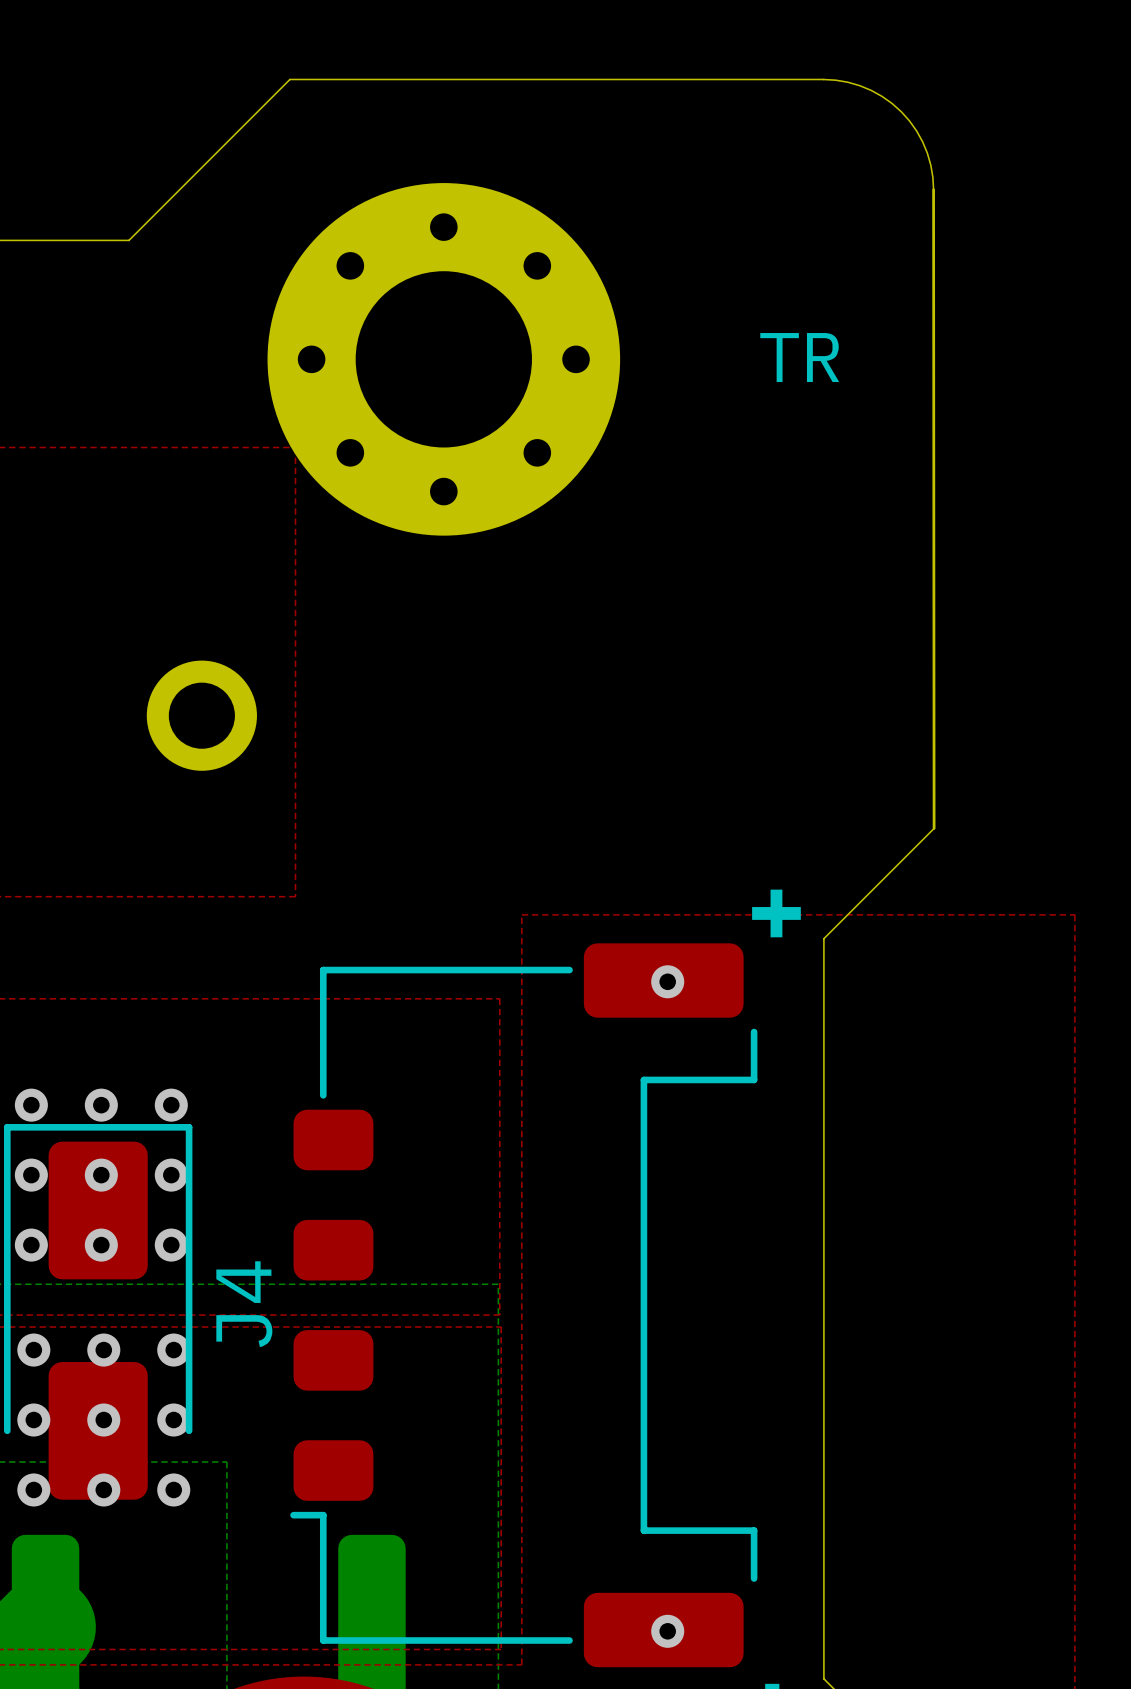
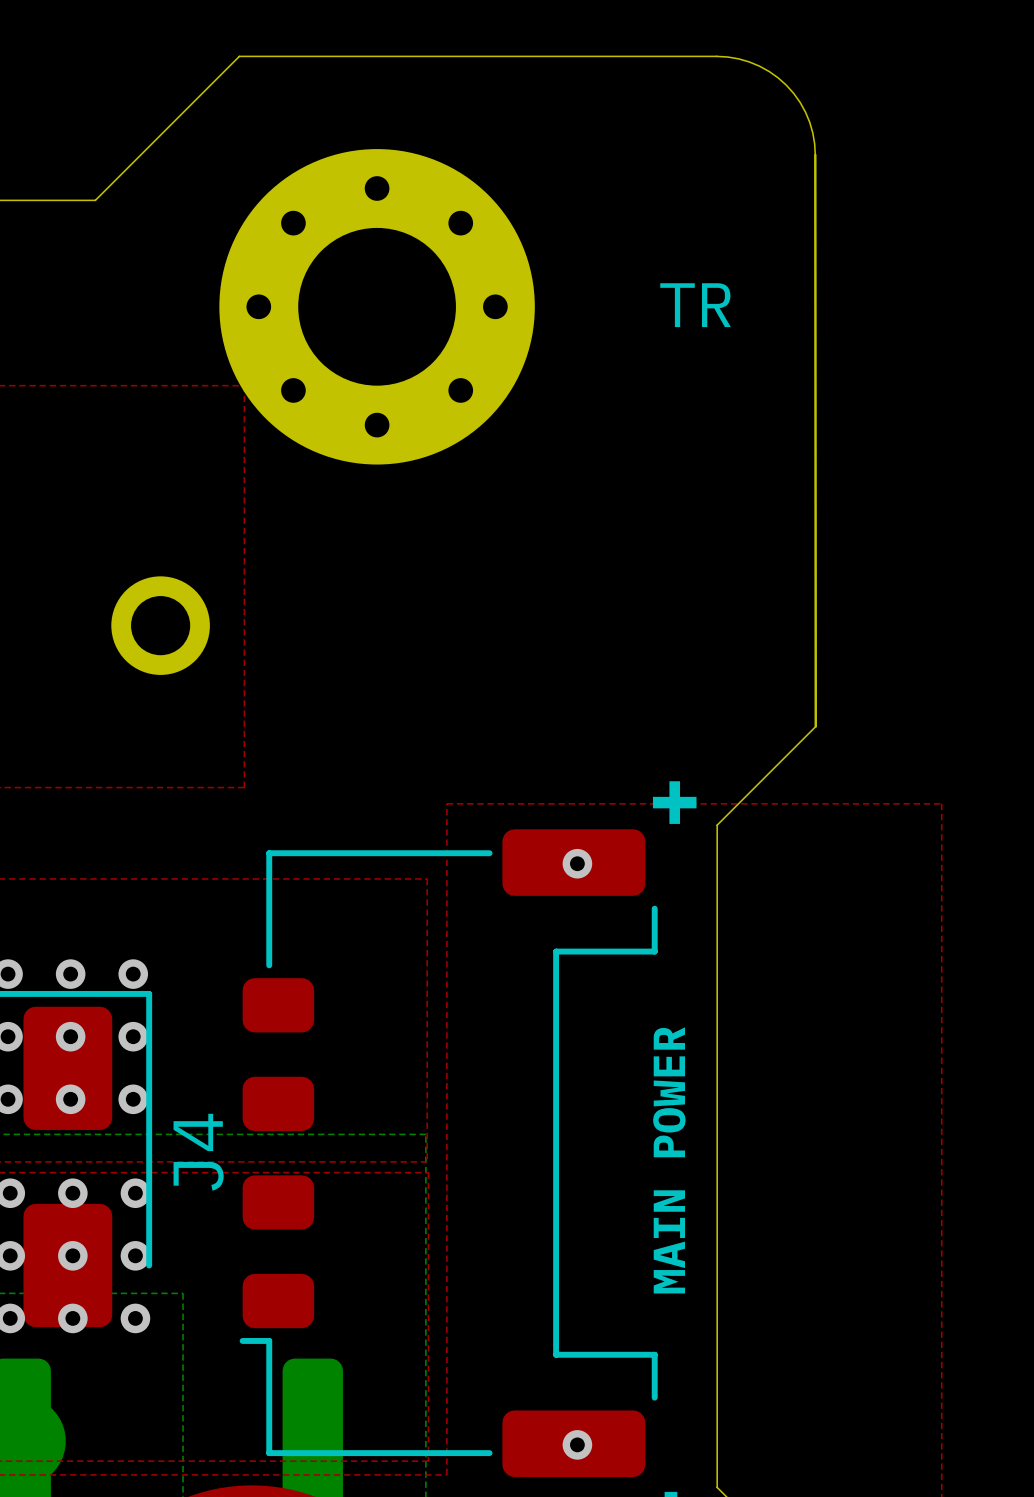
text: none -> MAIN POWER (669, 1160)

